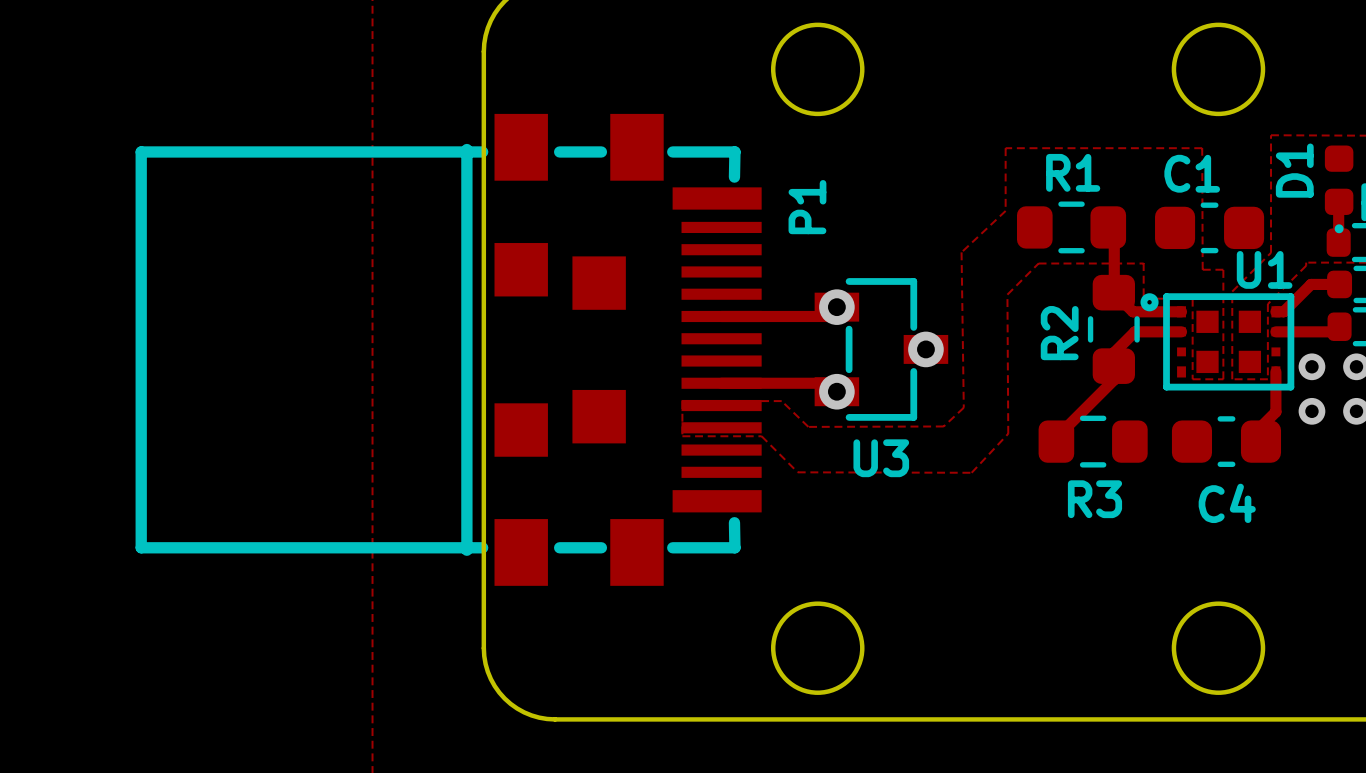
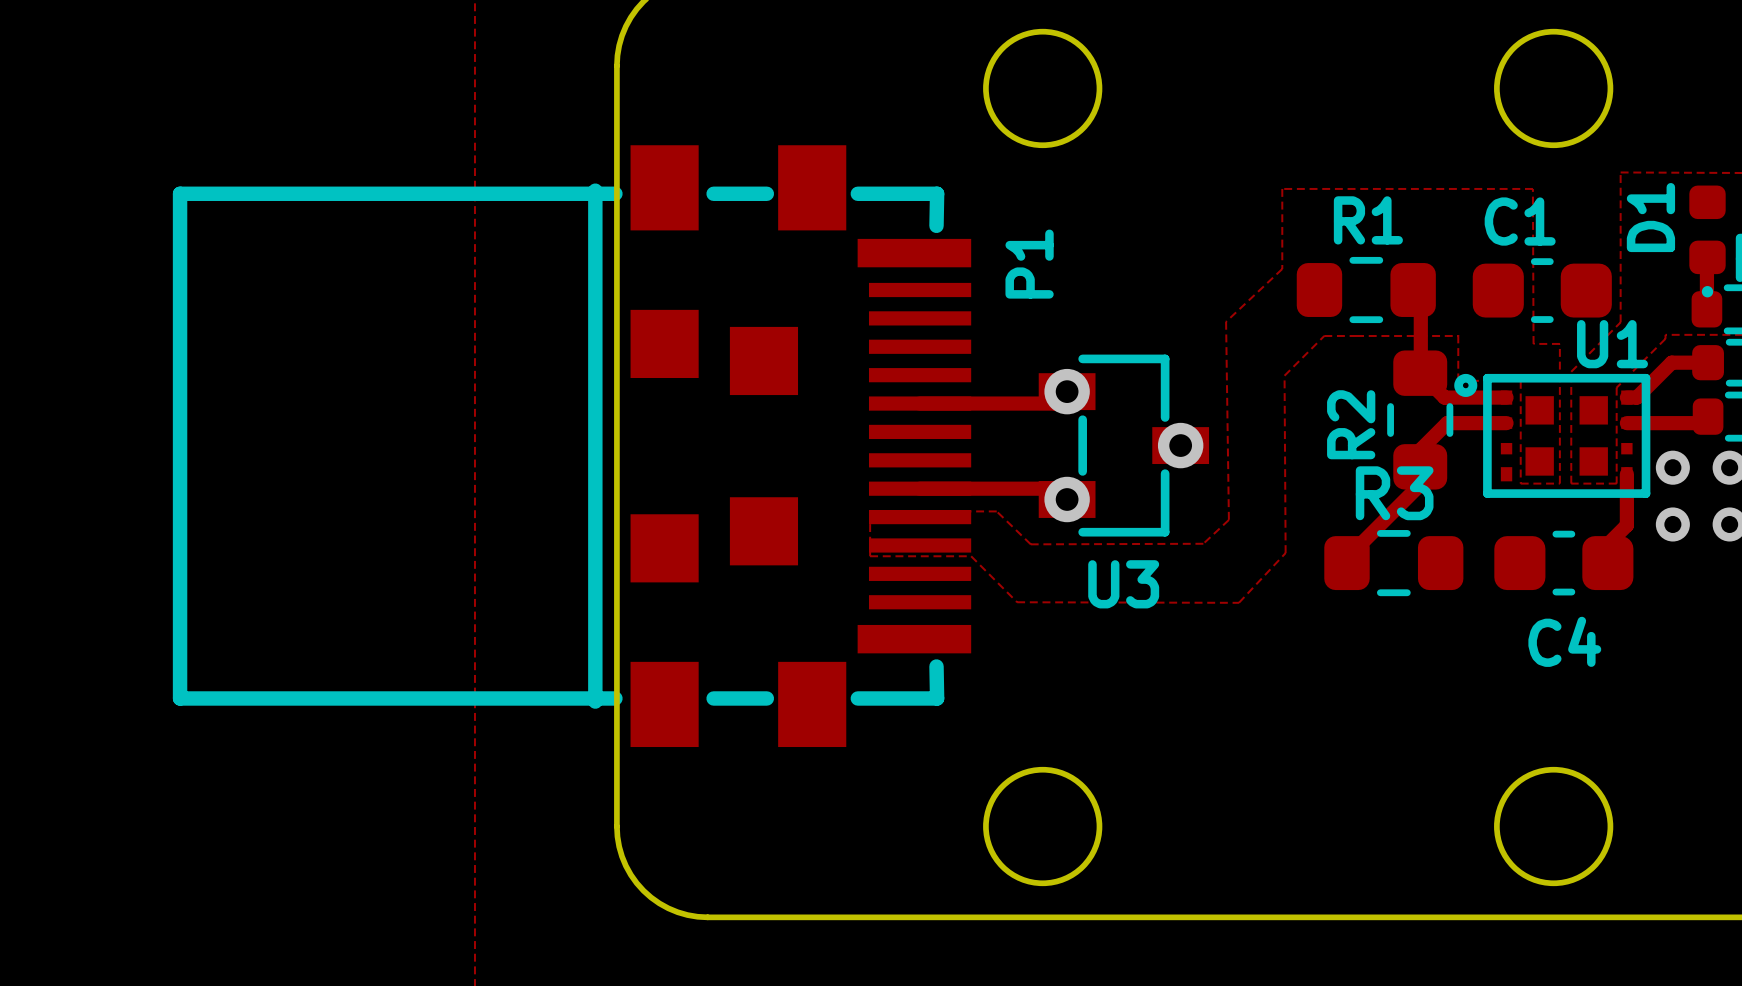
R3 name position: R3 (1094, 499) -> R3 (1394, 493)

